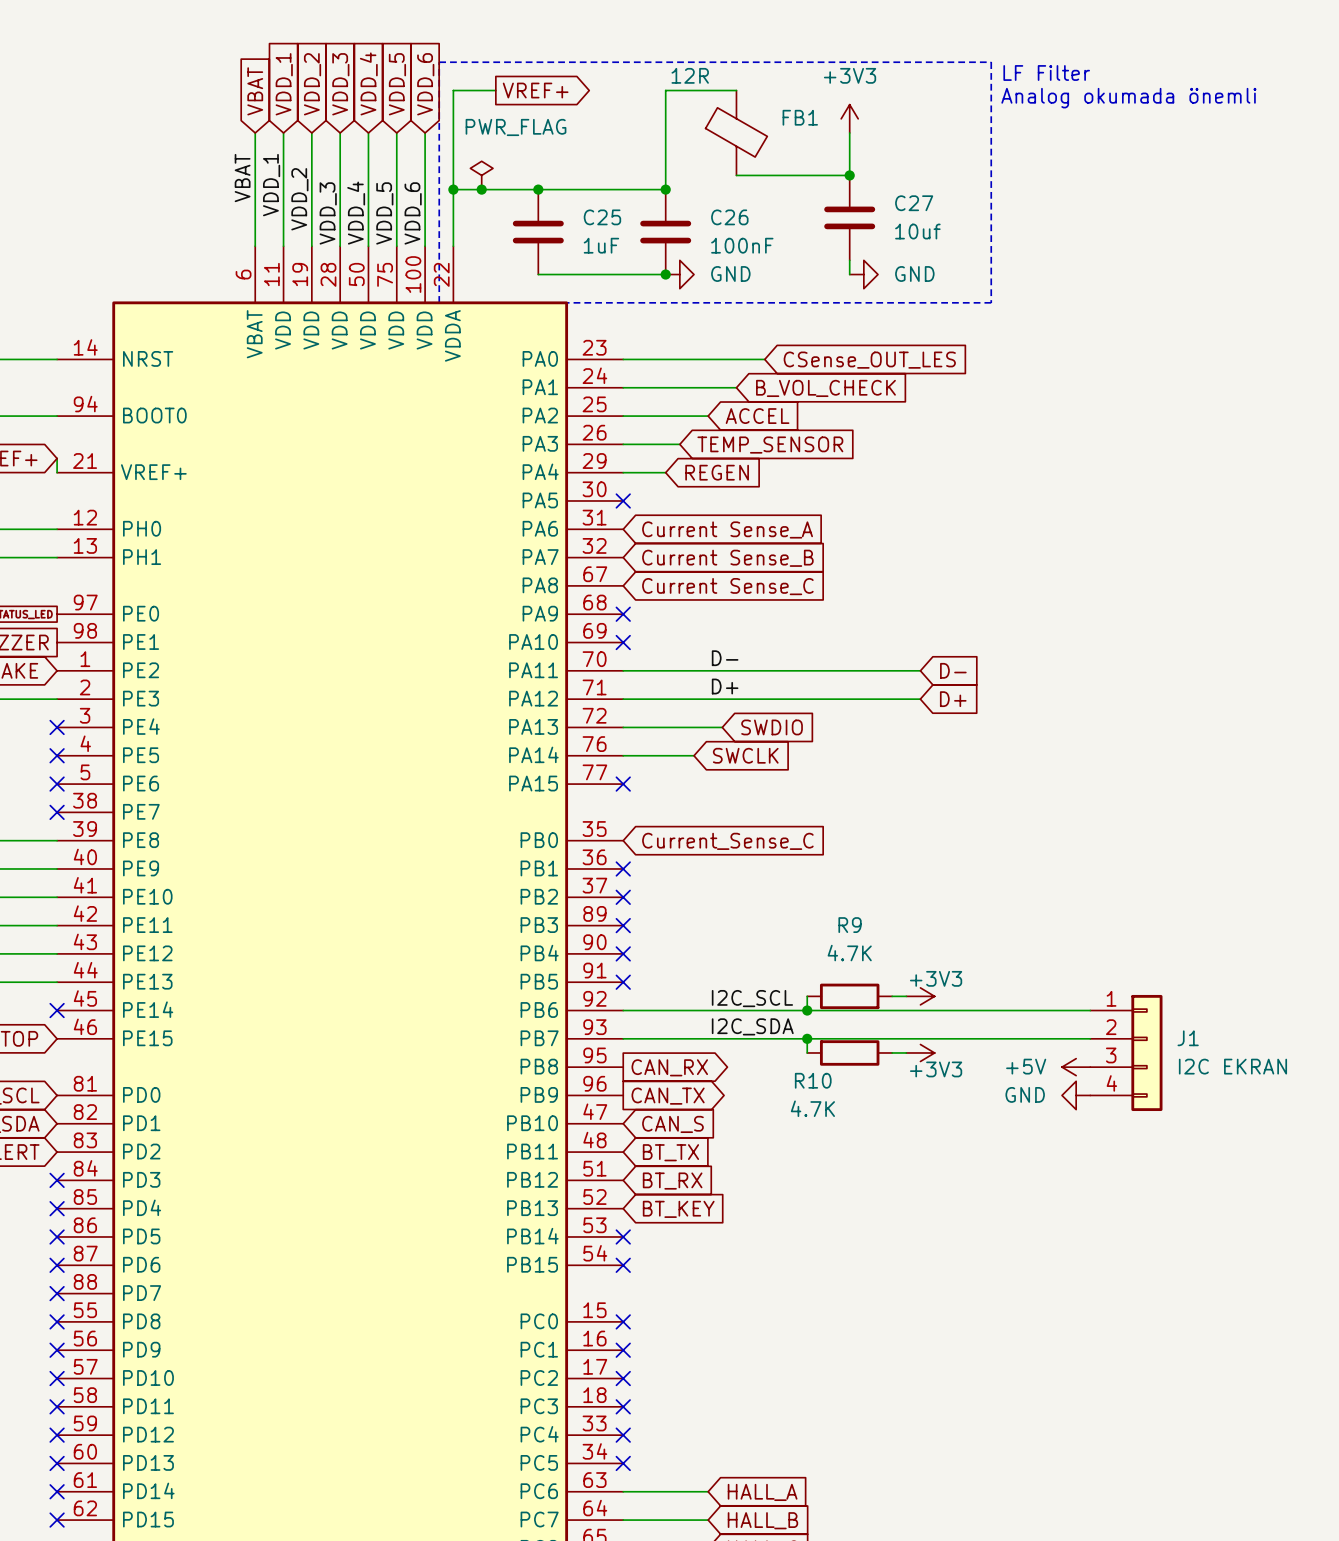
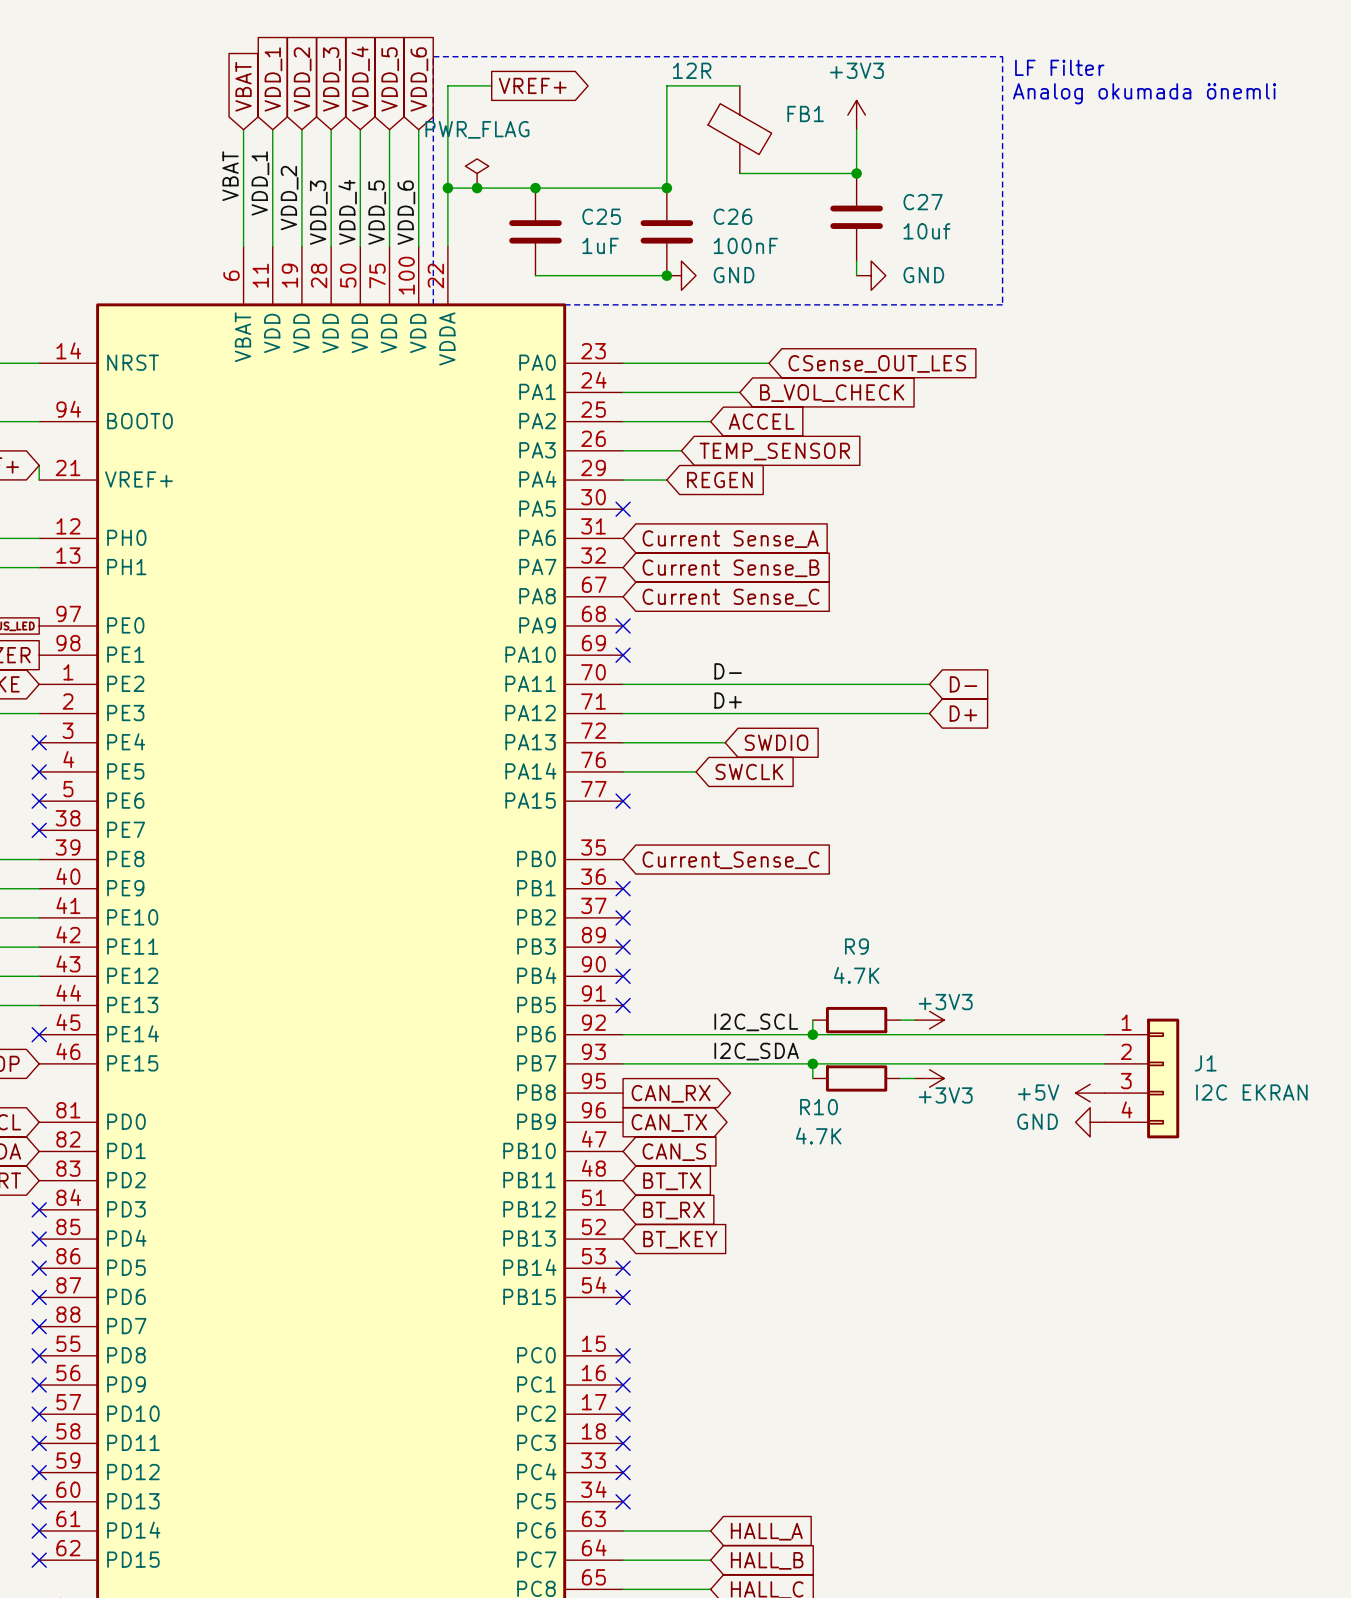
power symbol text position: PWR_FLAG (516, 127) -> PWR_FLAG (477, 129)

